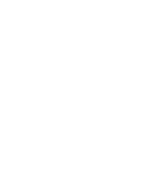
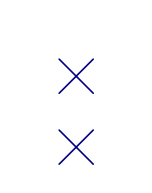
no-connect mark: none -> (76, 76)
no-connect mark: none -> (76, 147)

